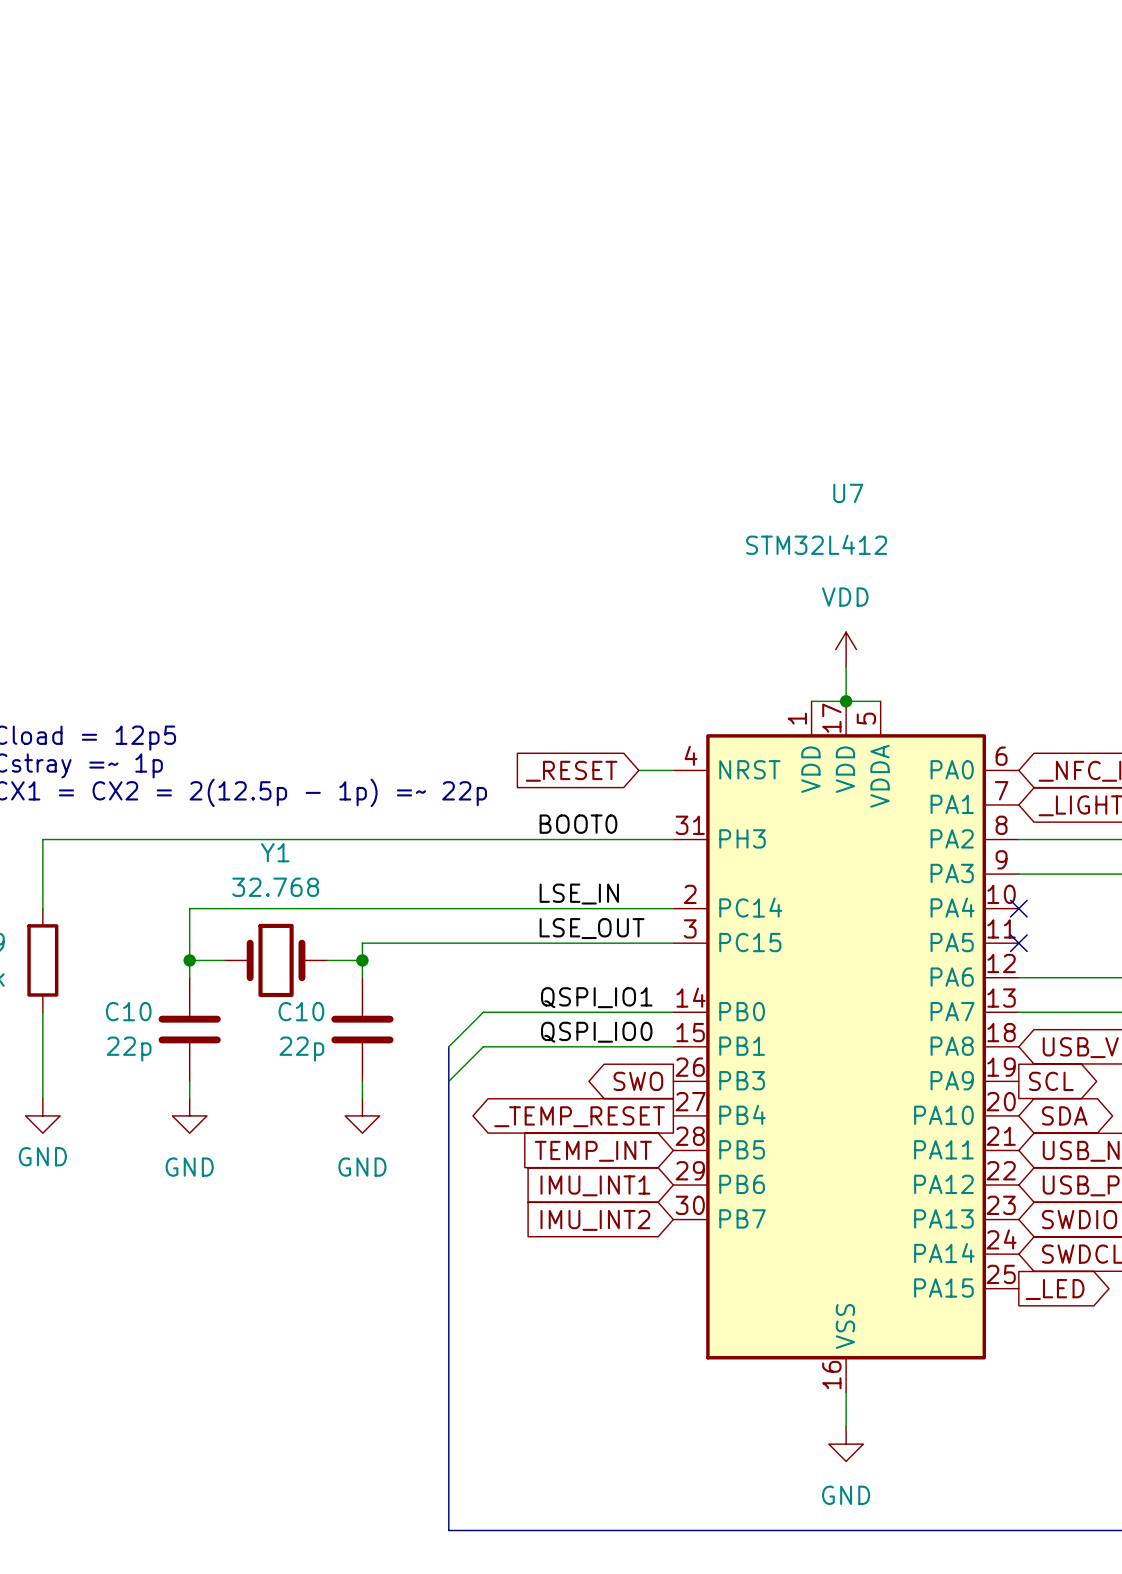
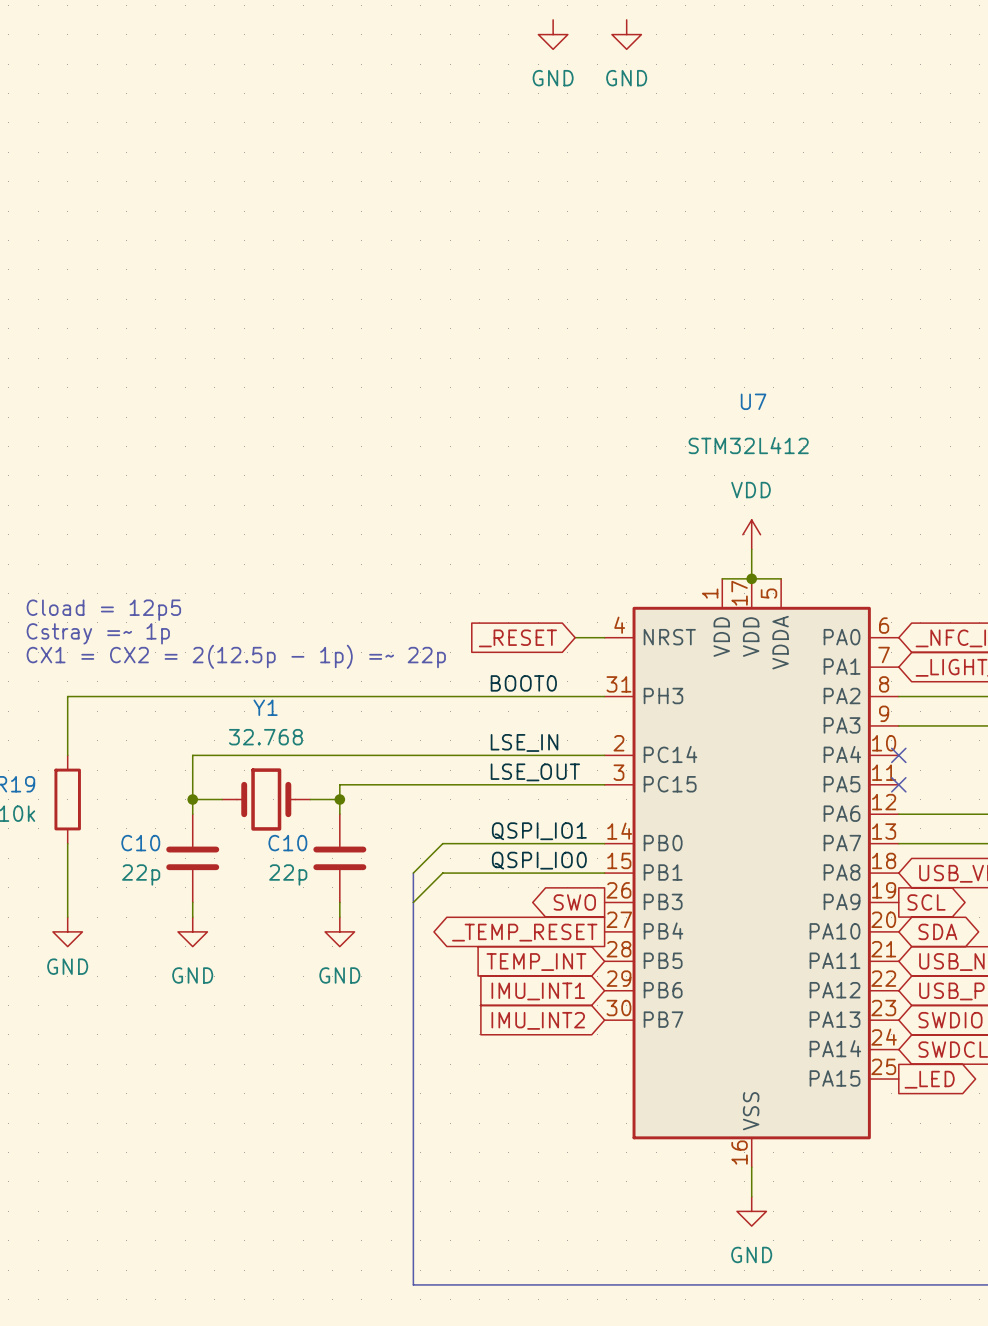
power symbol: none -> GND (553, 34)
power symbol: none -> GND (626, 34)
U7 value position: STM32L412 (816, 544) -> STM32L412 (748, 445)

